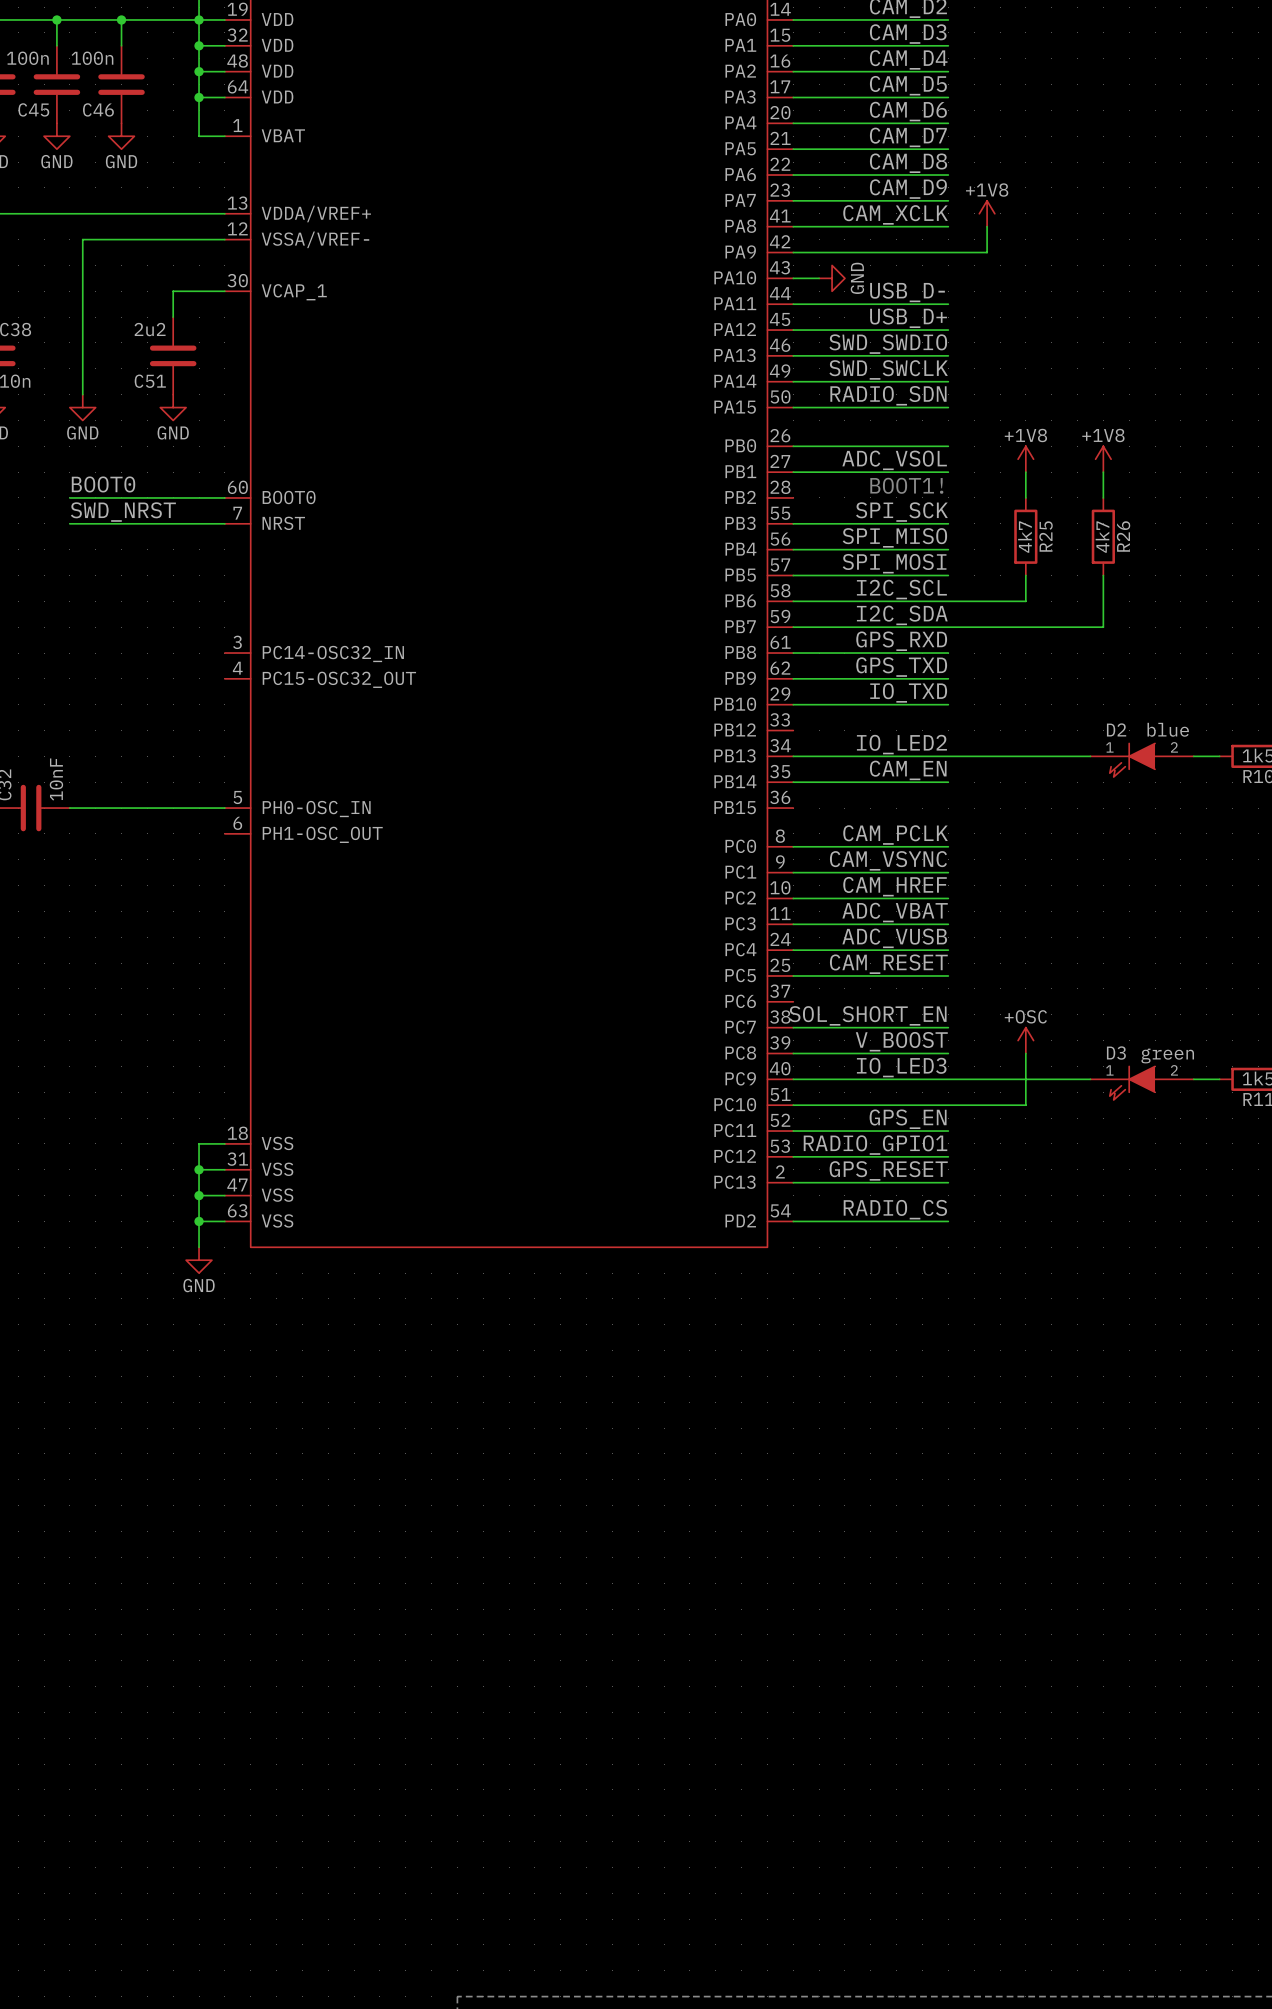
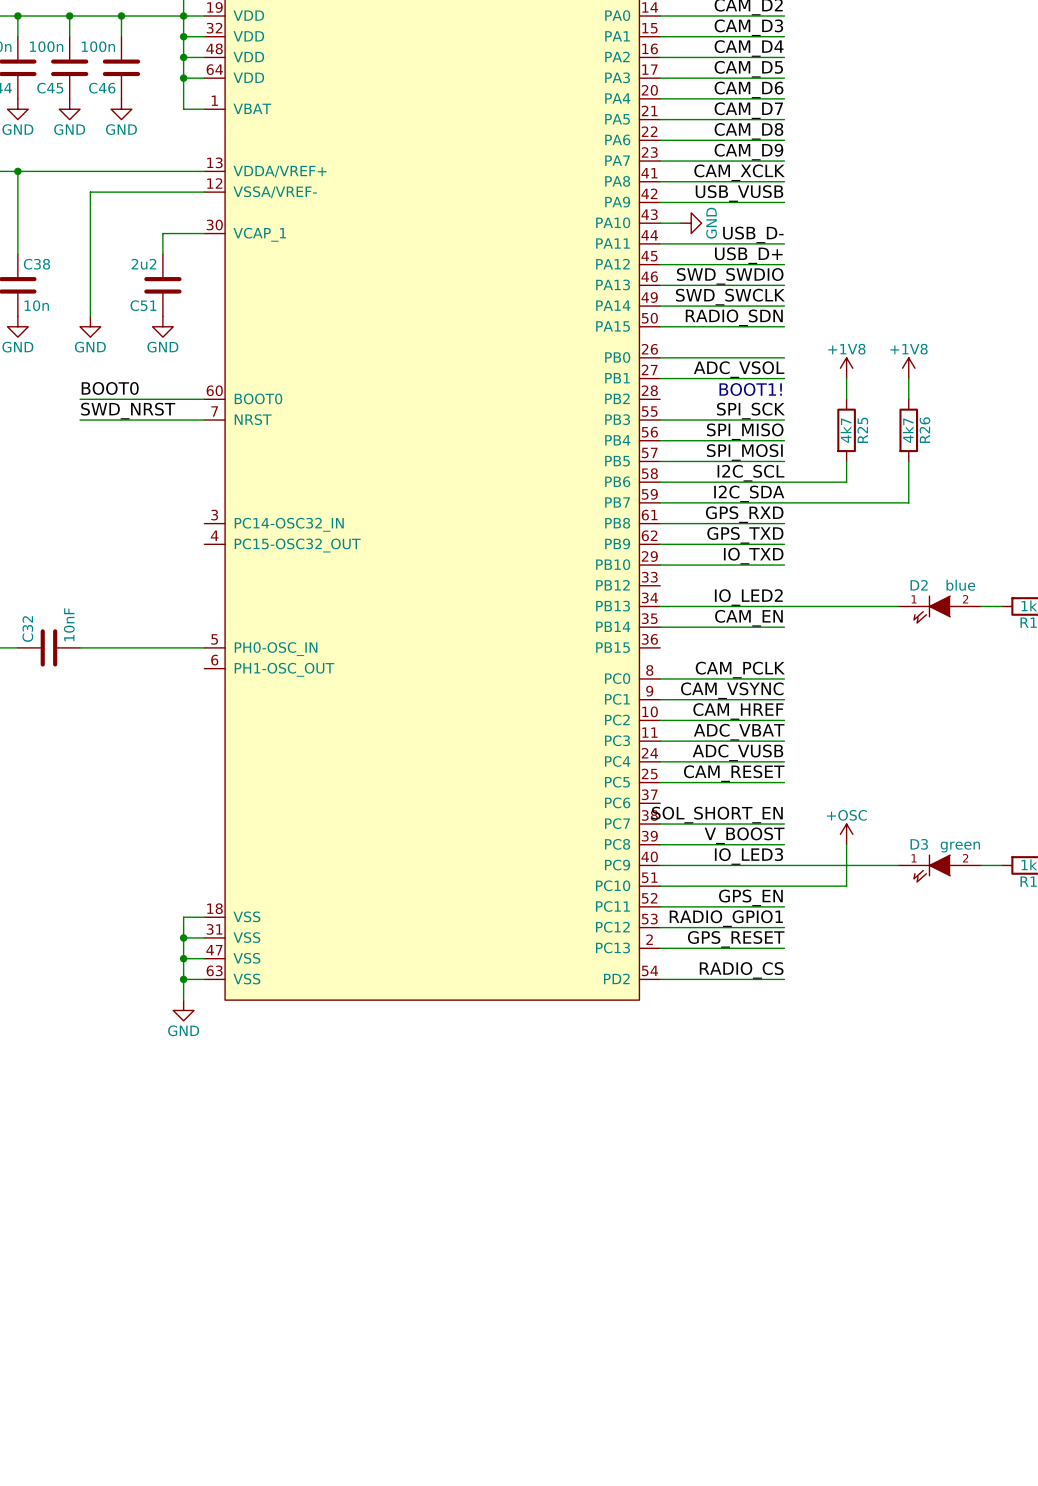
power symbol: +1V8 (987, 213) -> none
wire: (987, 226) (987, 252) (948, 252) -> none
label: none -> USB_VUSB (739, 193)

